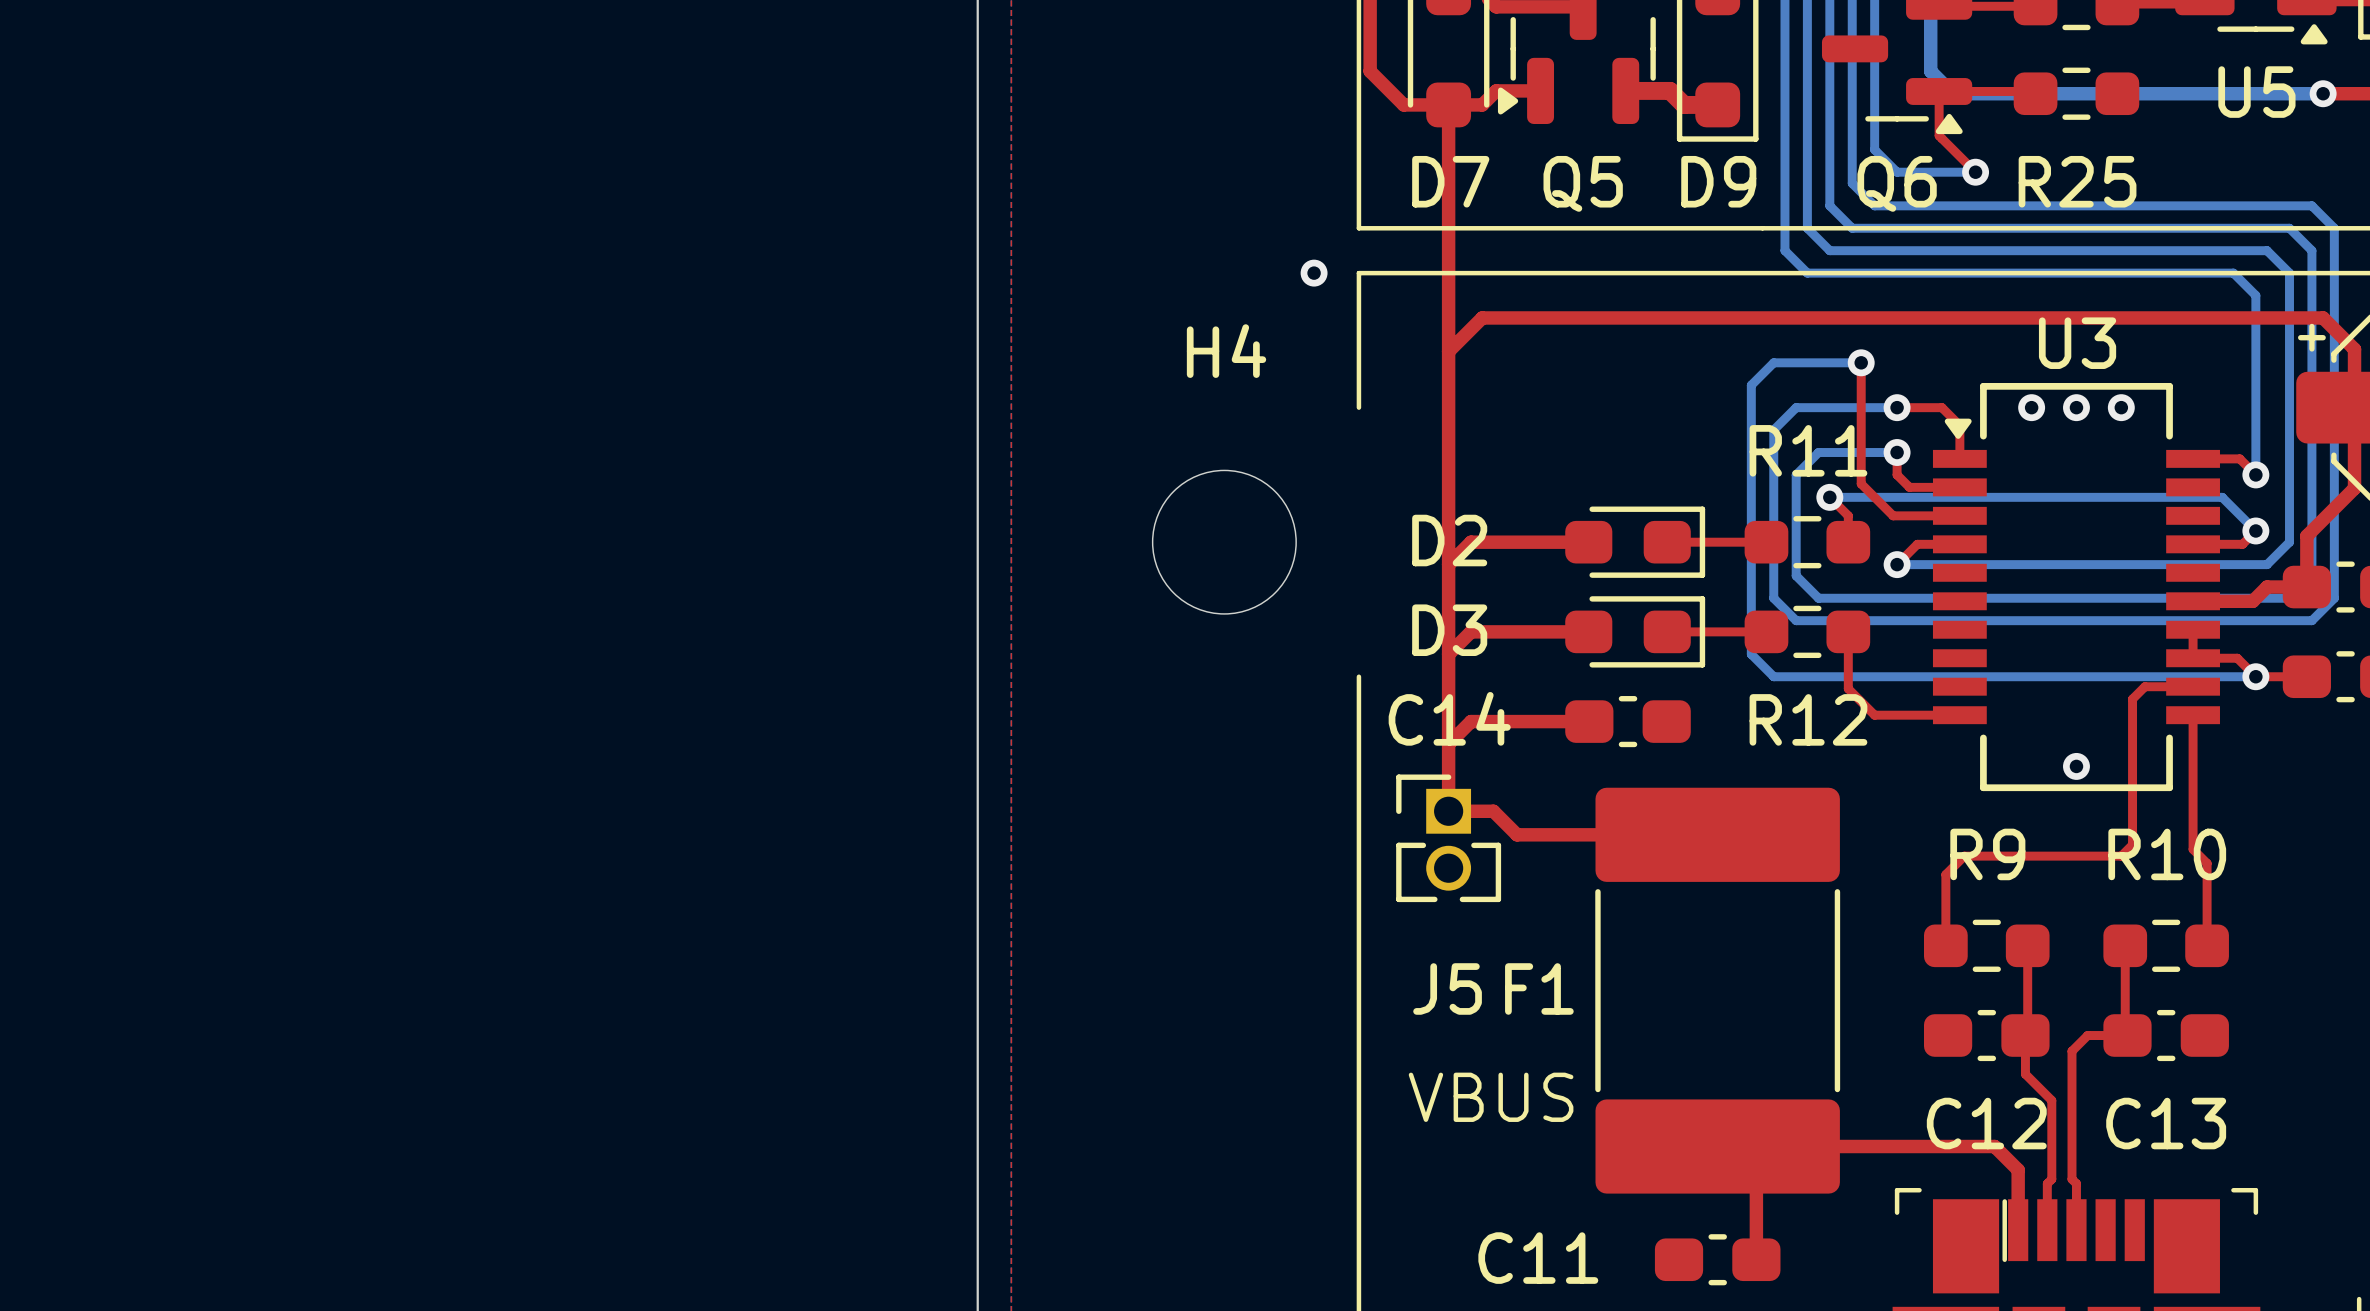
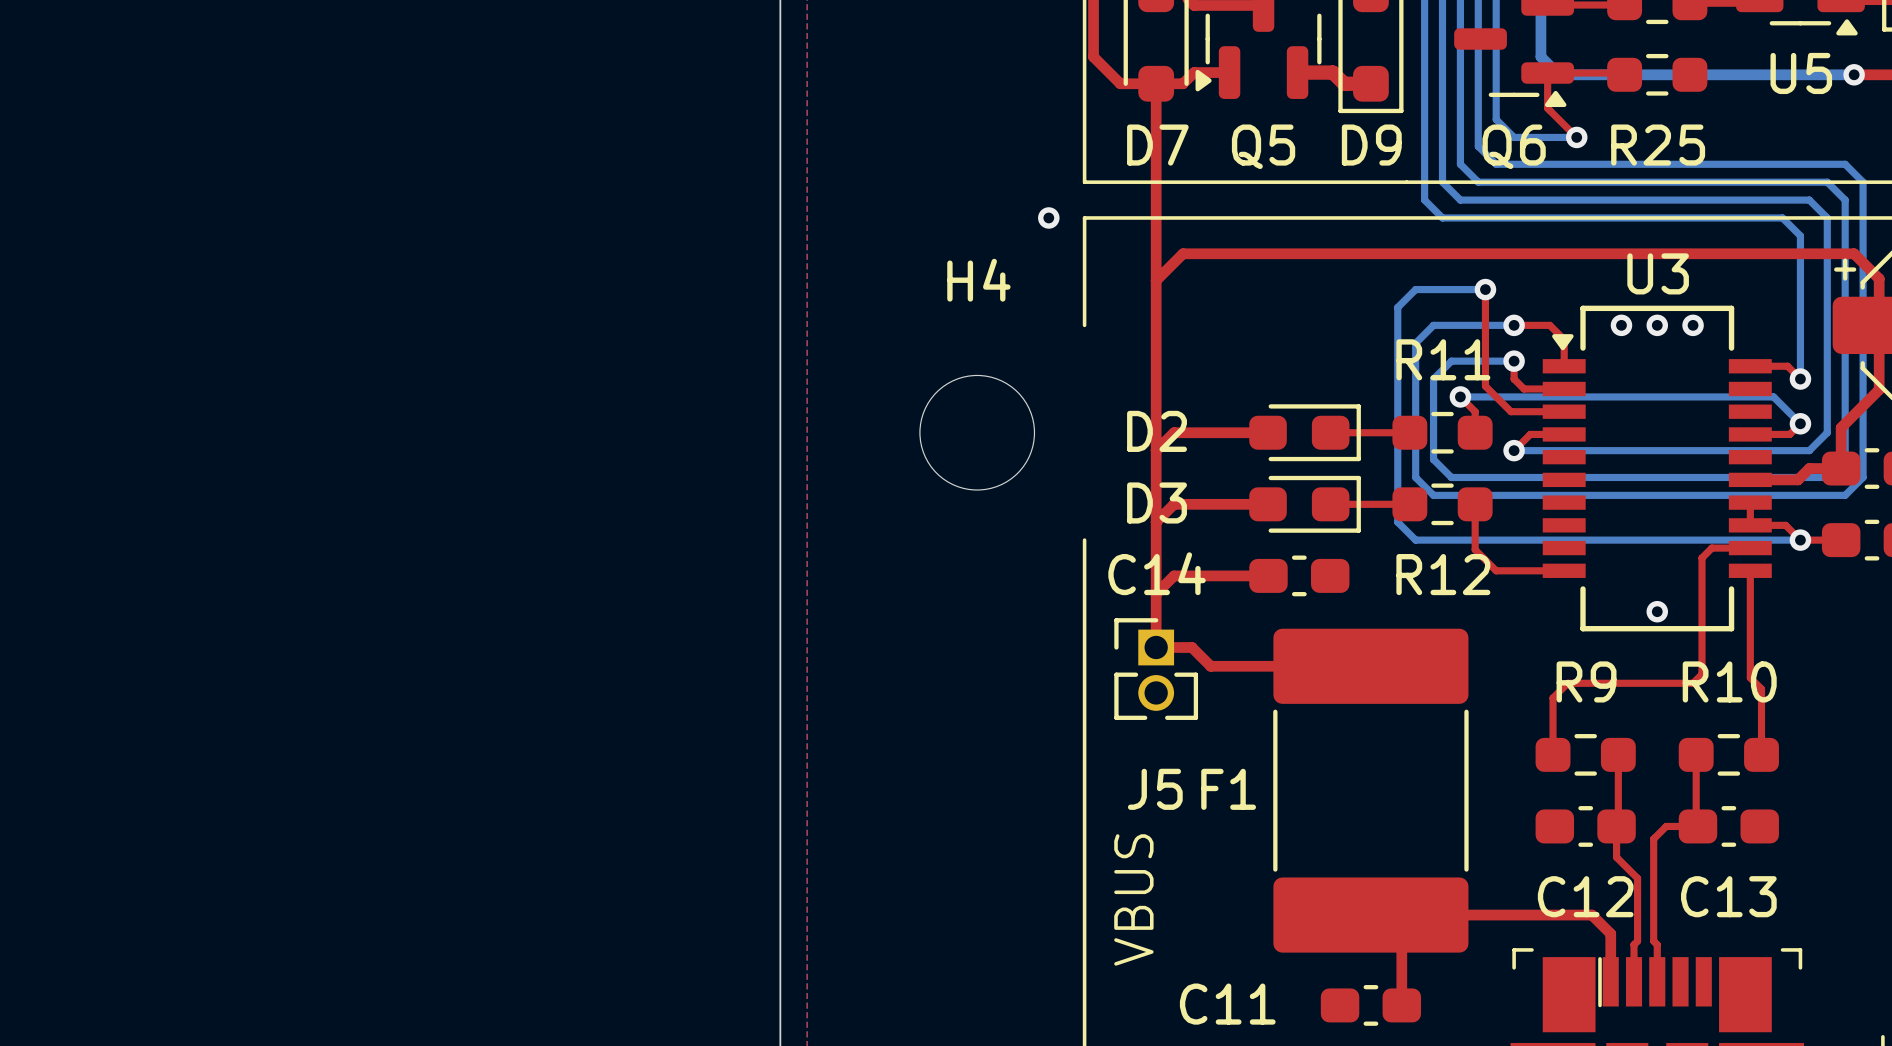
text rotation: 0° (1491, 1097) -> 90° counterclockwise (1133, 899)

